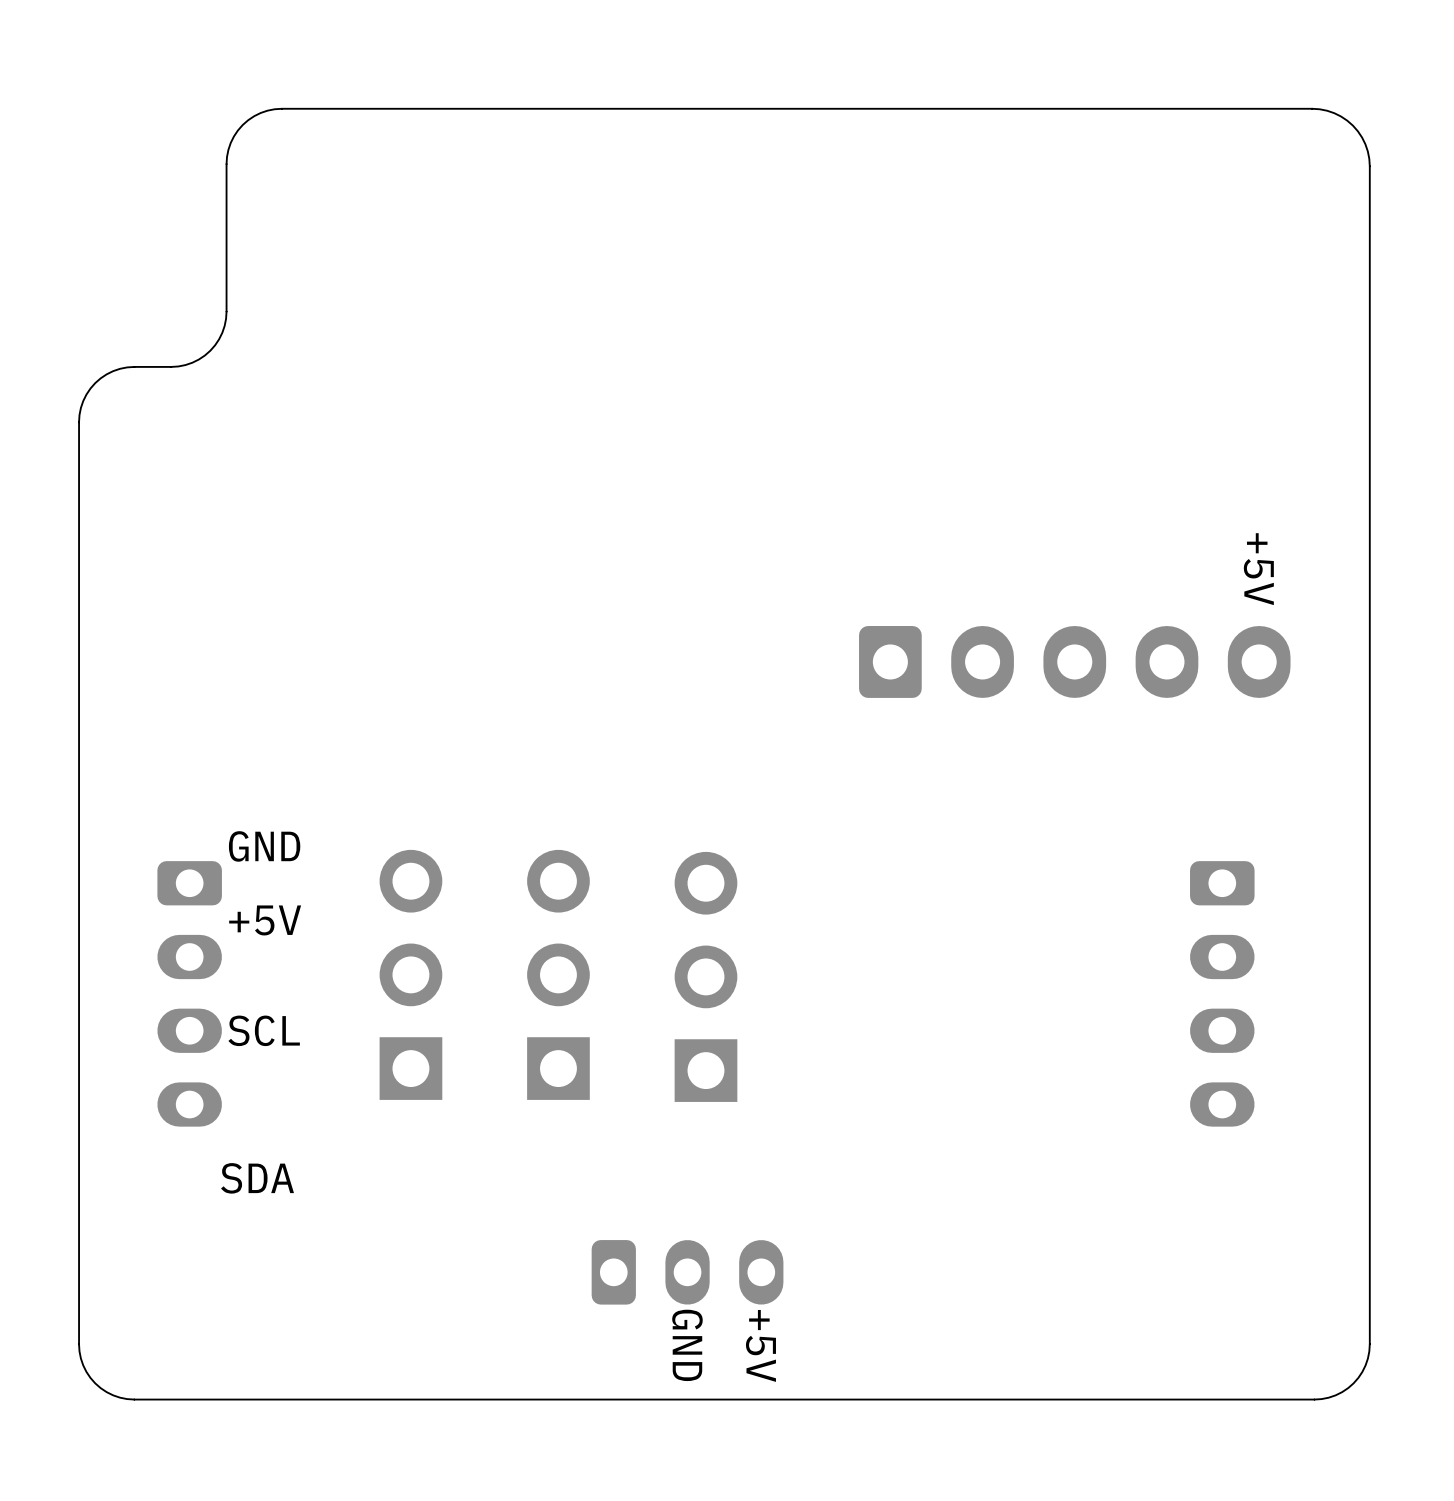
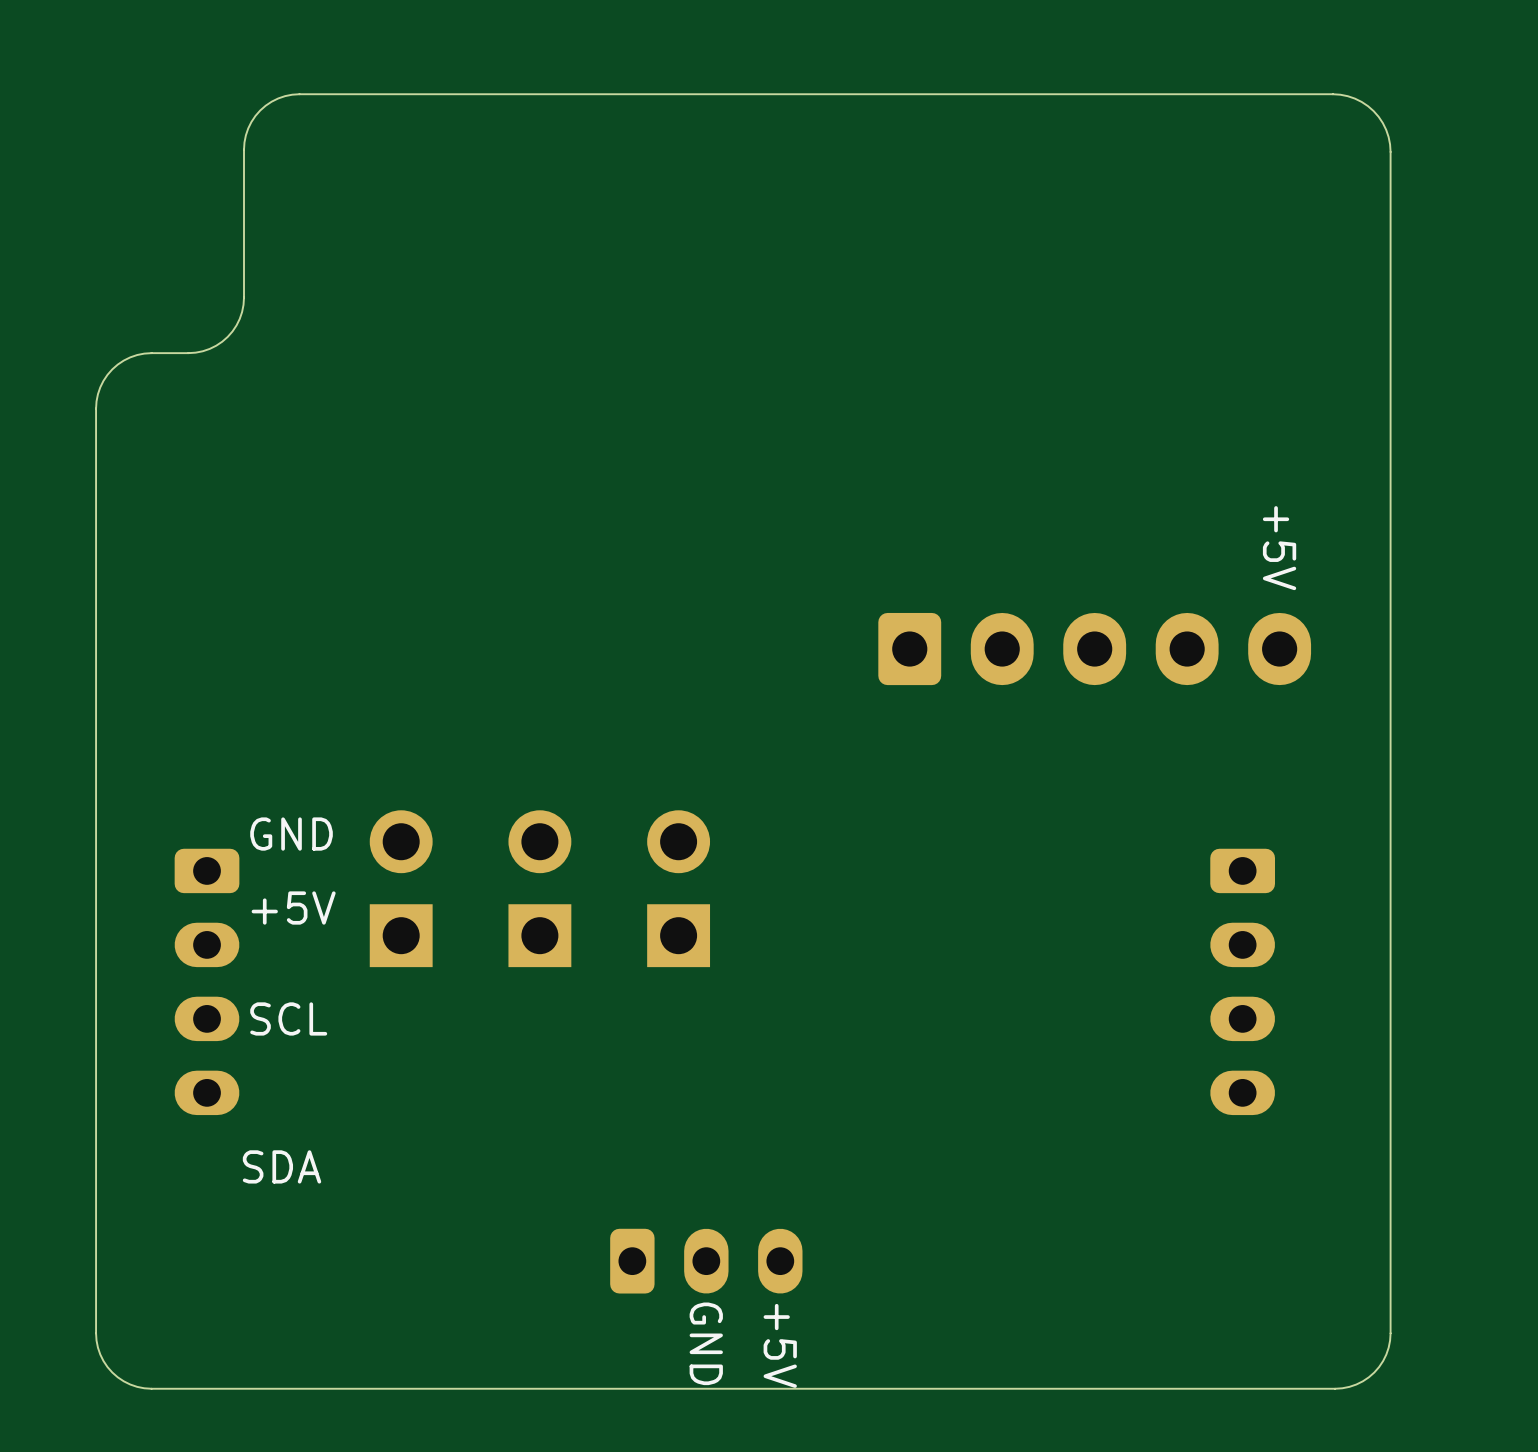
part: none -> (401, 888)
part: none -> (539, 888)
part: none -> (678, 888)
part: (410, 974) -> none
part: (558, 974) -> none
part: (705, 976) -> none

